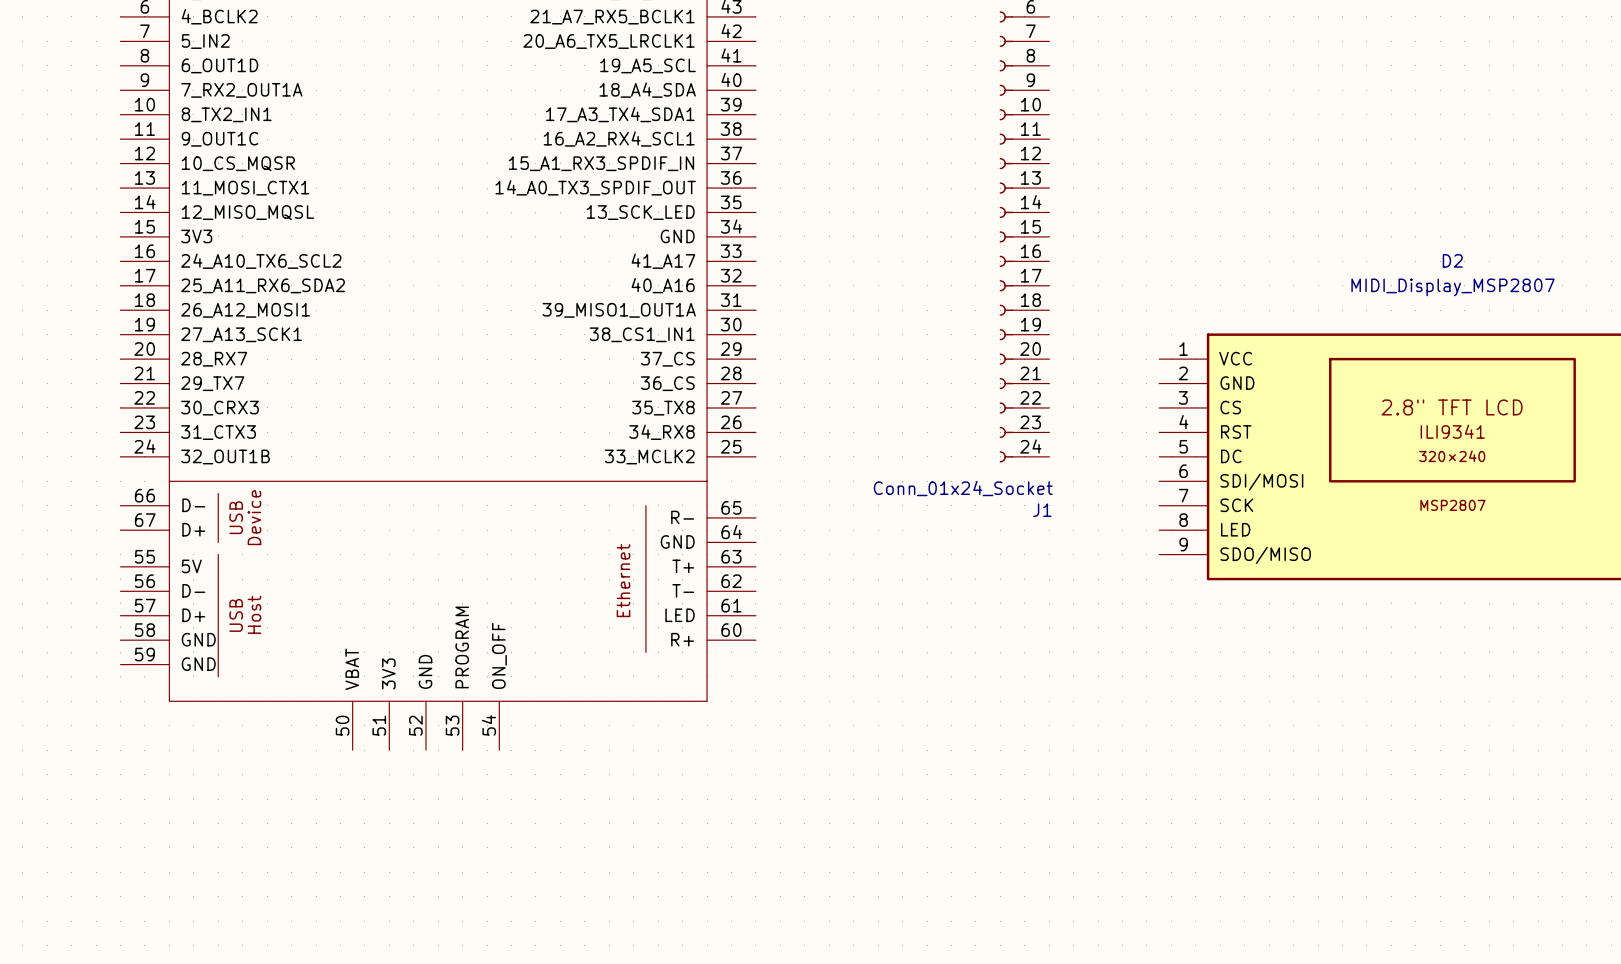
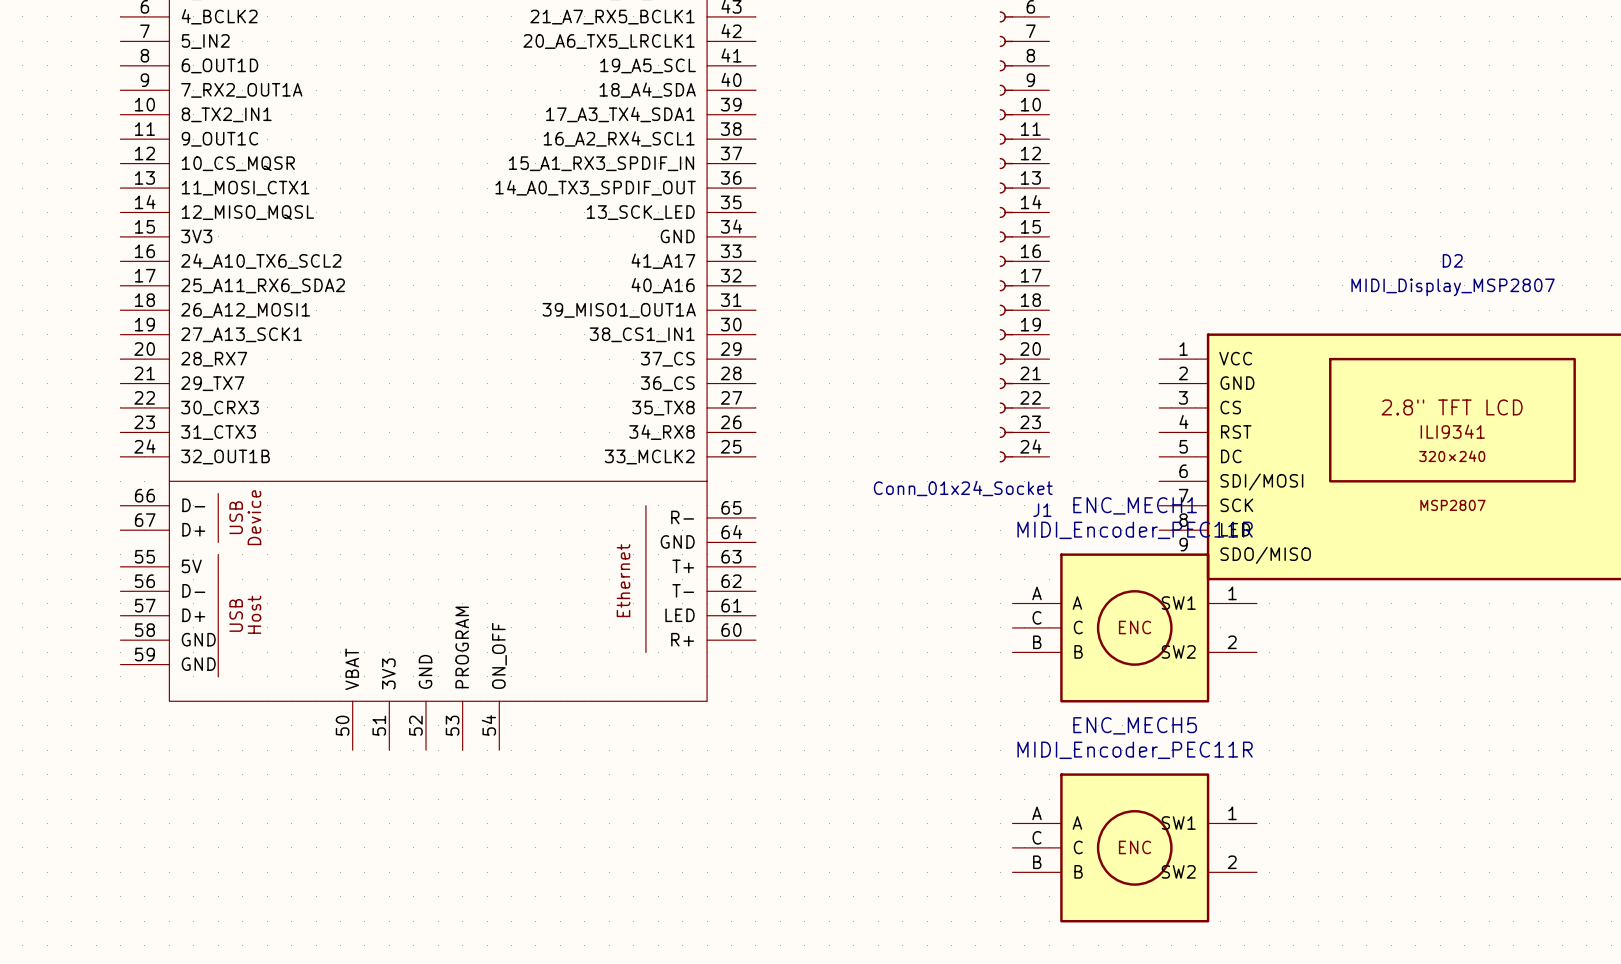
ENC_MECH1: none -> MIDI_Encoder_PEC11R (1134, 627)
ENC_MECH5: none -> MIDI_Encoder_PEC11R (1134, 847)

